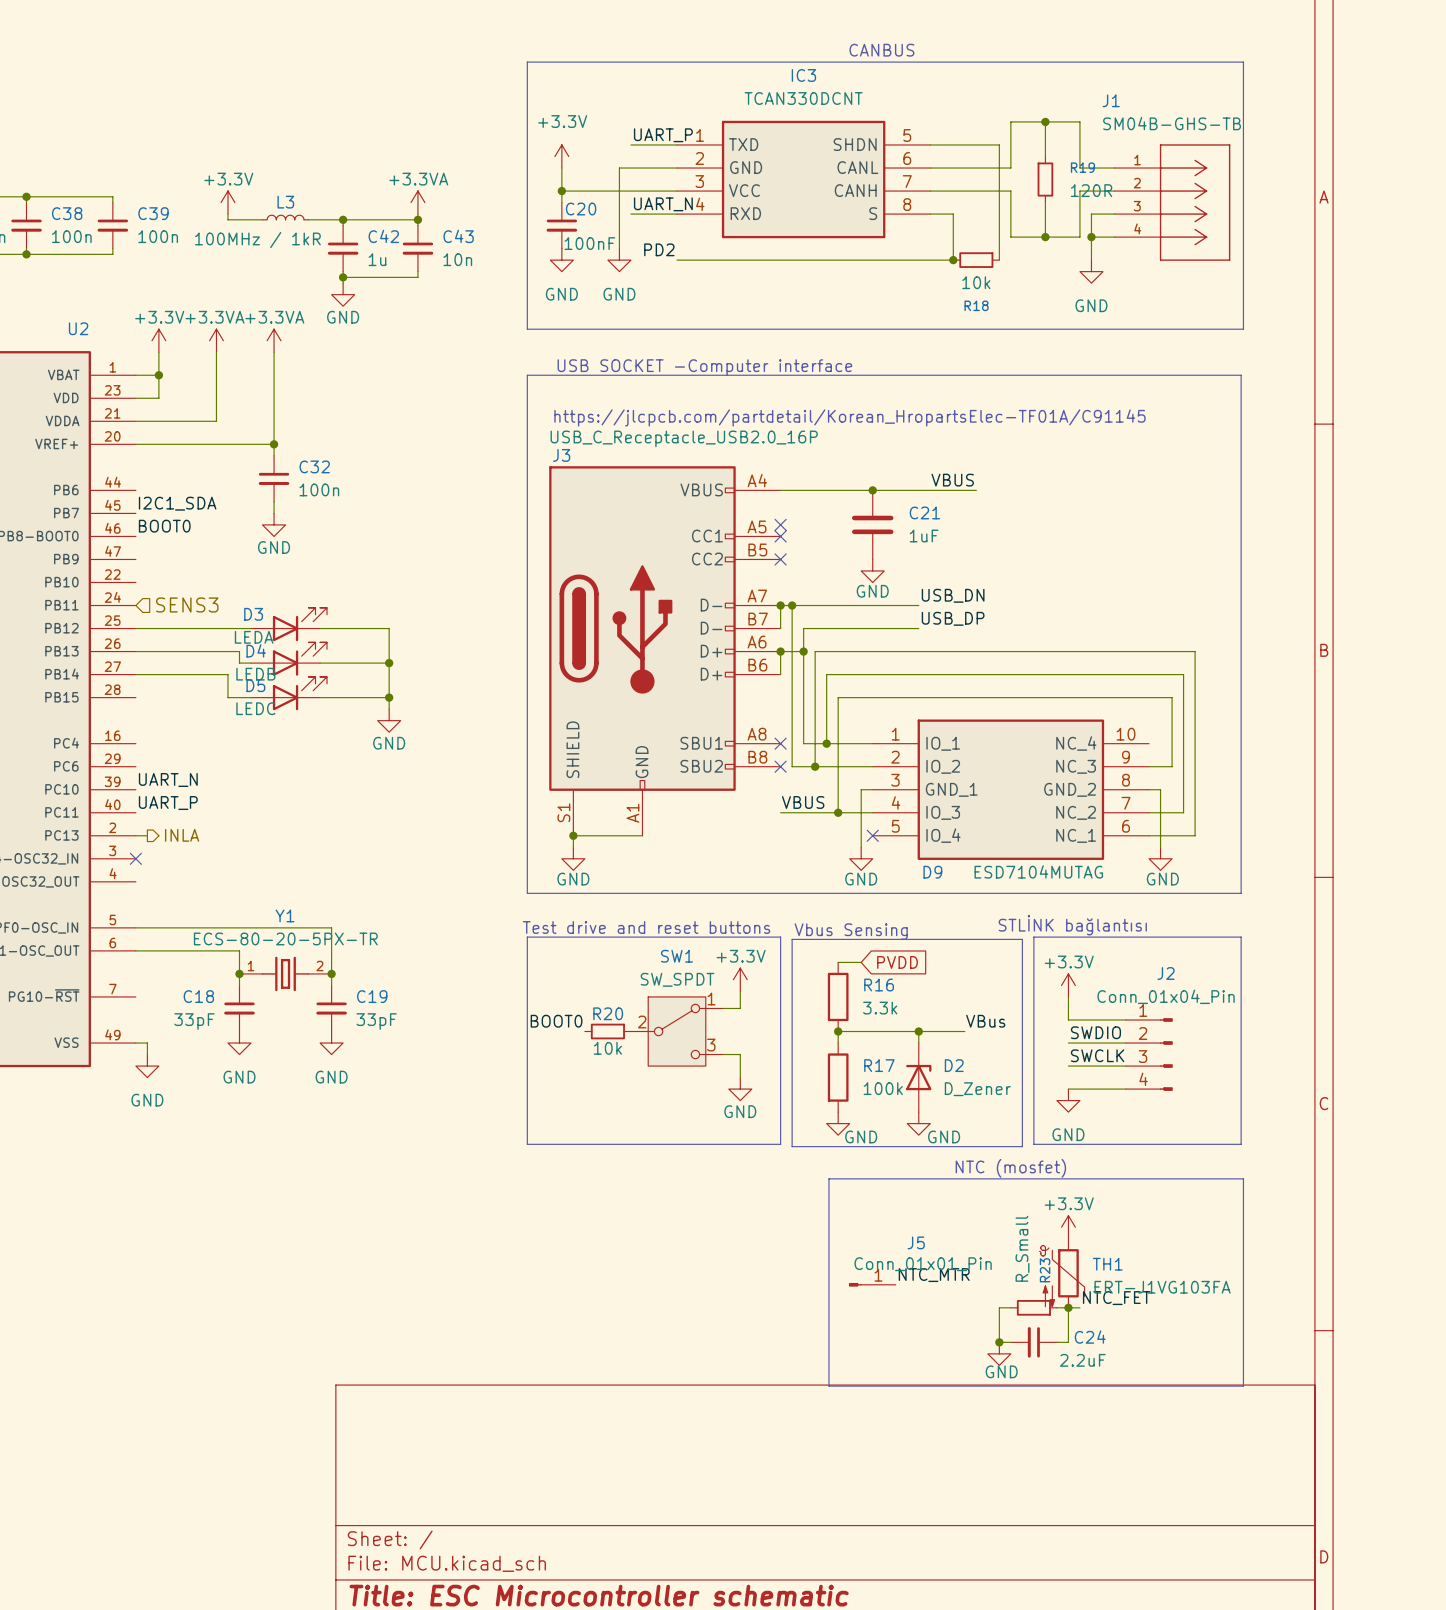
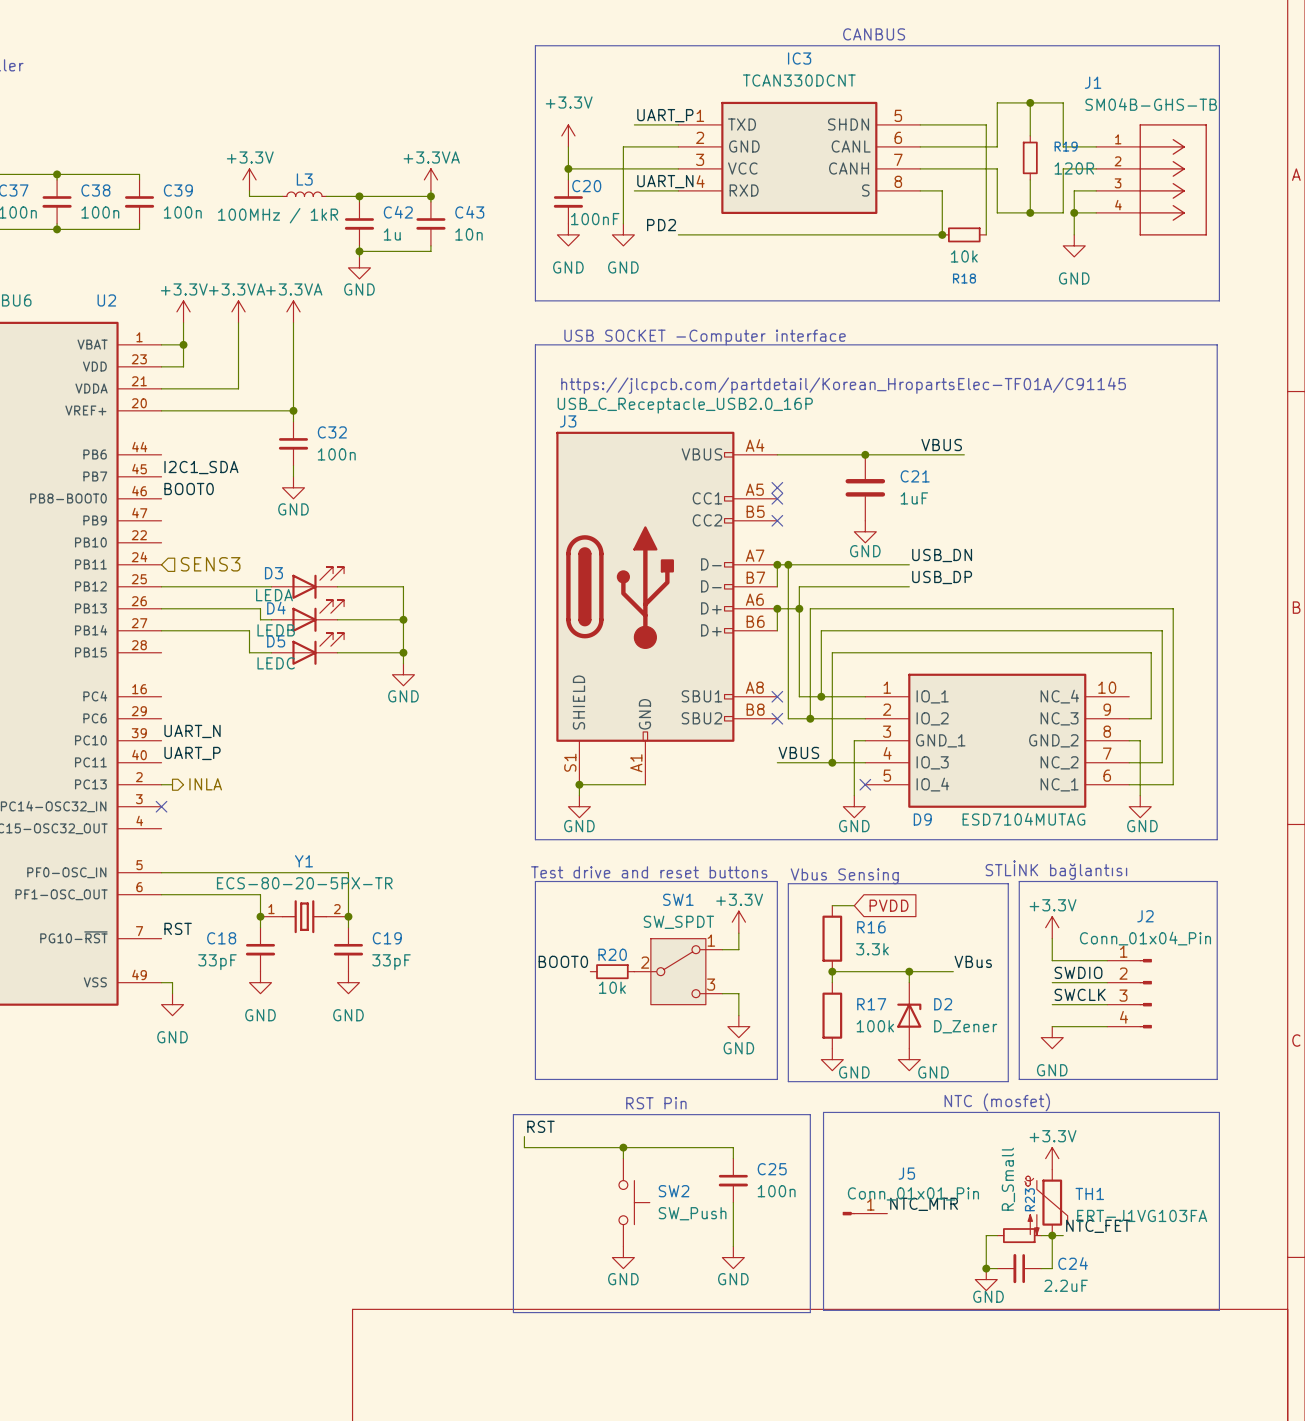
label: none -> RST (178, 928)
text: none -> RST Pin (656, 1103)
line: none -> (513, 1114) (810, 1114) (810, 1312) (513, 1312) (513, 1114)
label: none -> RST (540, 1126)
wire: none -> (524, 1136) (524, 1147) (733, 1147) (733, 1158)
wire: none -> (623, 1147) (623, 1158)
junction: none -> (623, 1147)
C25: none -> 100n (733, 1180)
SW2: none -> SW_Push (634, 1202)
wire: none -> (733, 1202) (733, 1246)
power symbol: none -> GND (623, 1257)
power symbol: none -> GND (733, 1257)

